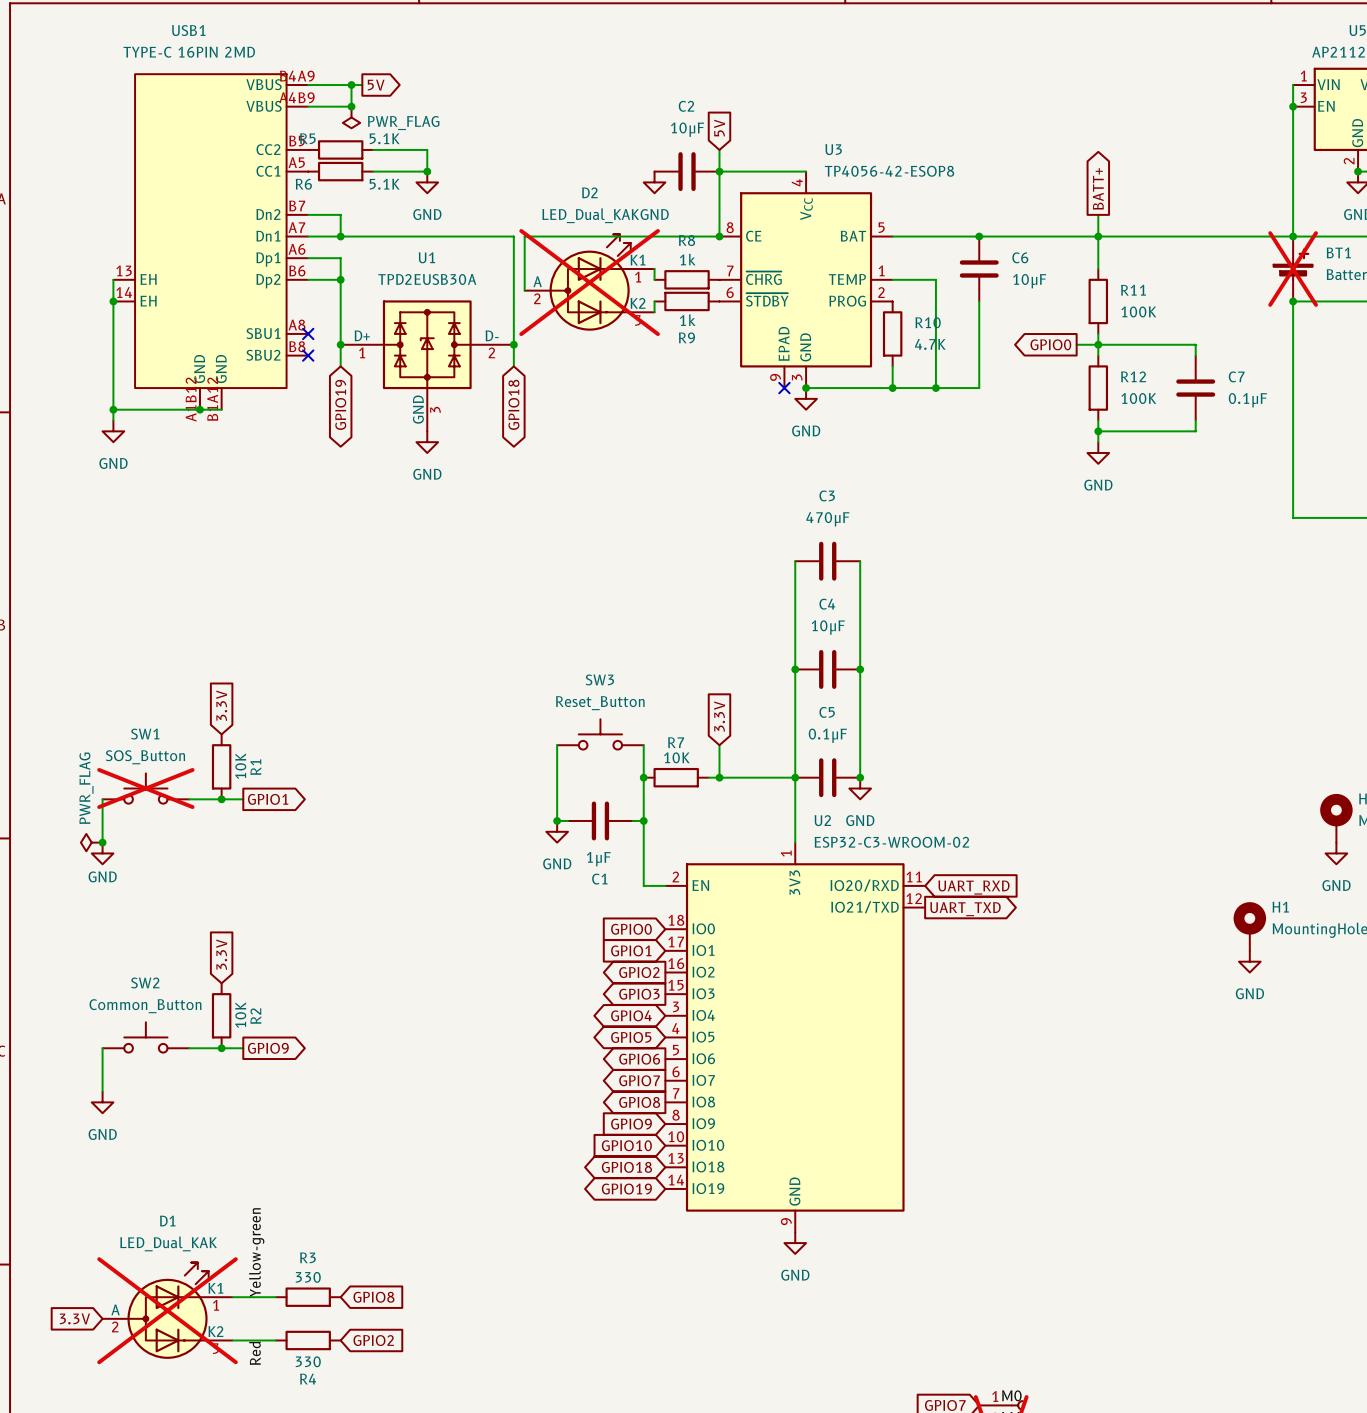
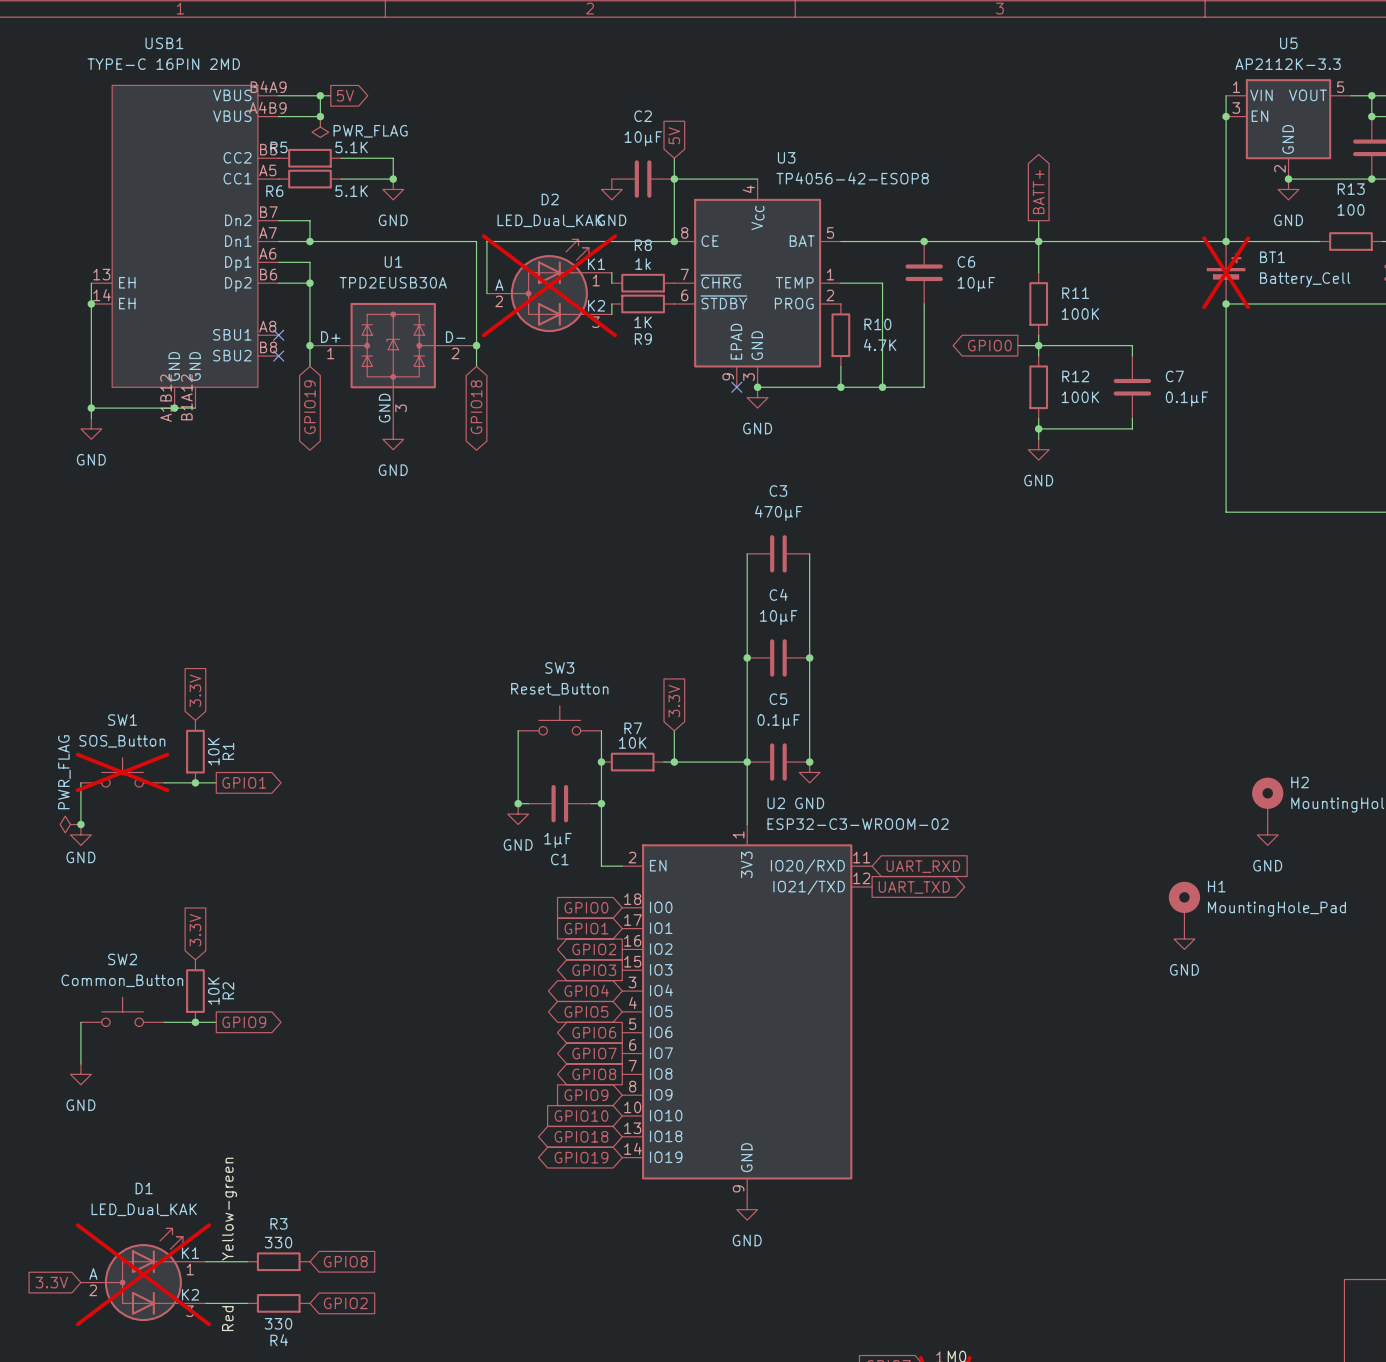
R9 value: 1k (687, 320) -> 1K (643, 322)

